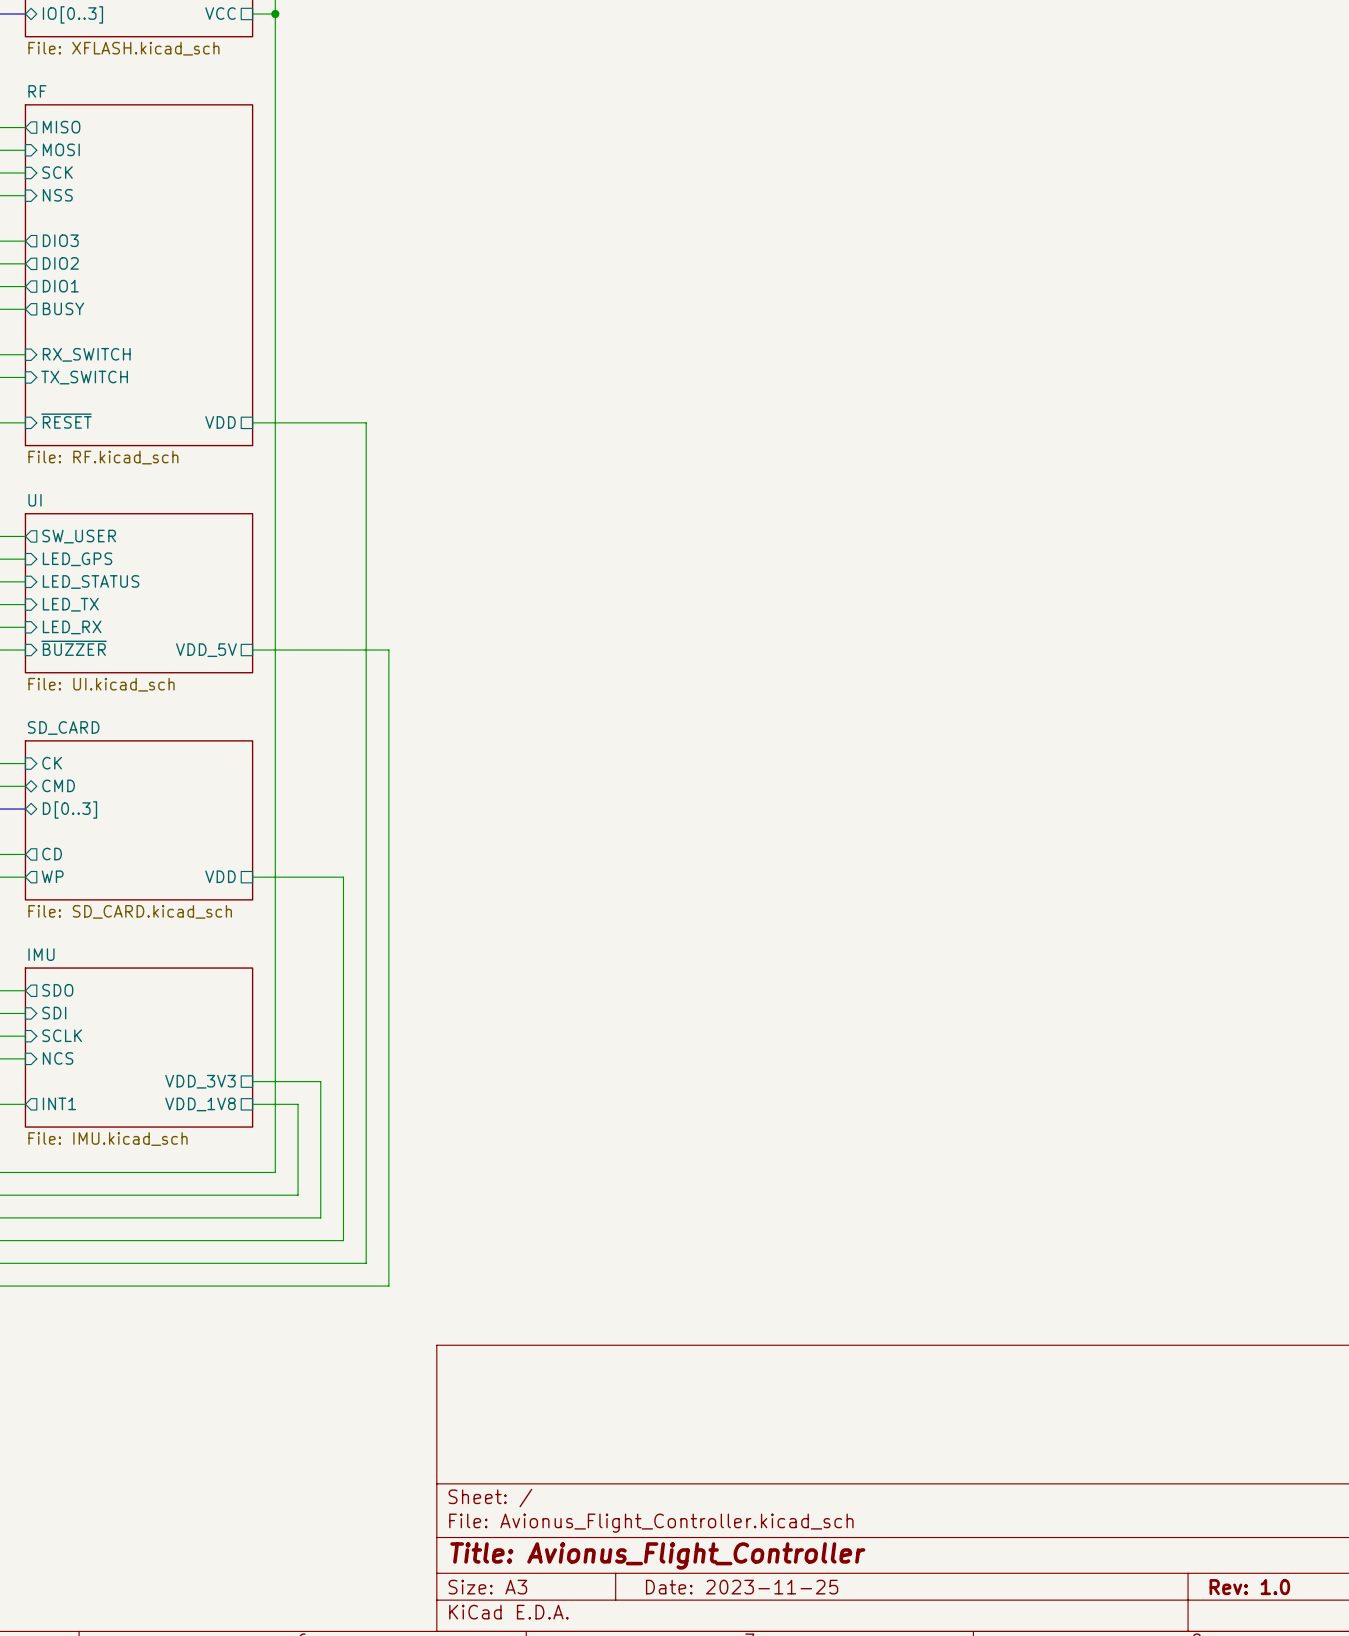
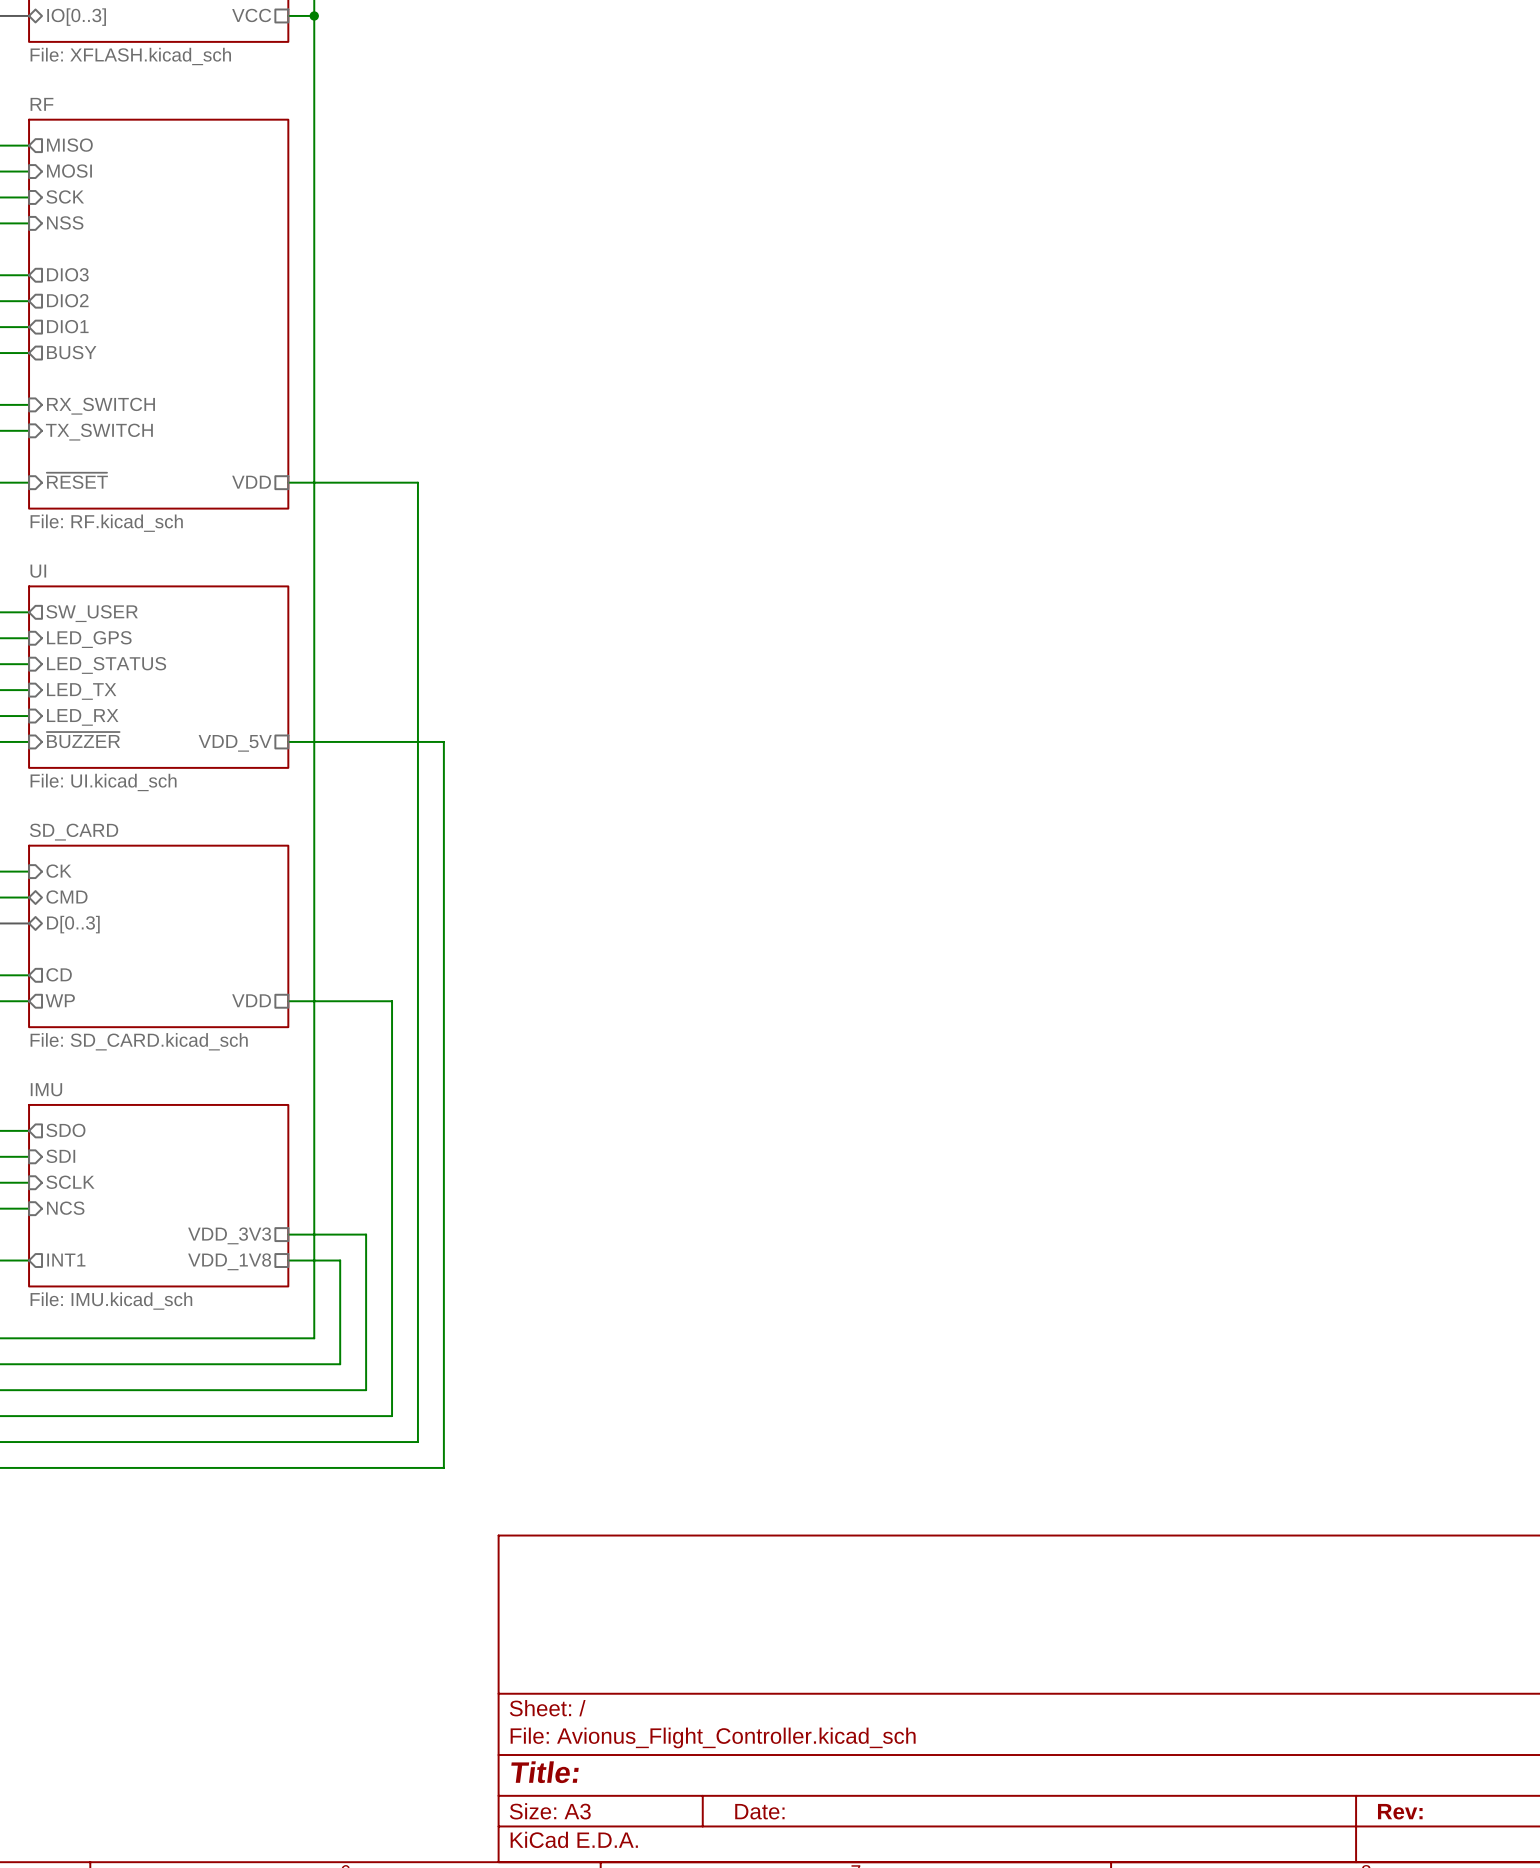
title block: Title: Avionus_Flight_Controller (657, 1555) -> Title: (545, 1772)
title block: Date: 2023-11-25 (742, 1587) -> Date: (759, 1811)
title block: Rev: 1.0 (1249, 1587) -> Rev: (1400, 1811)

